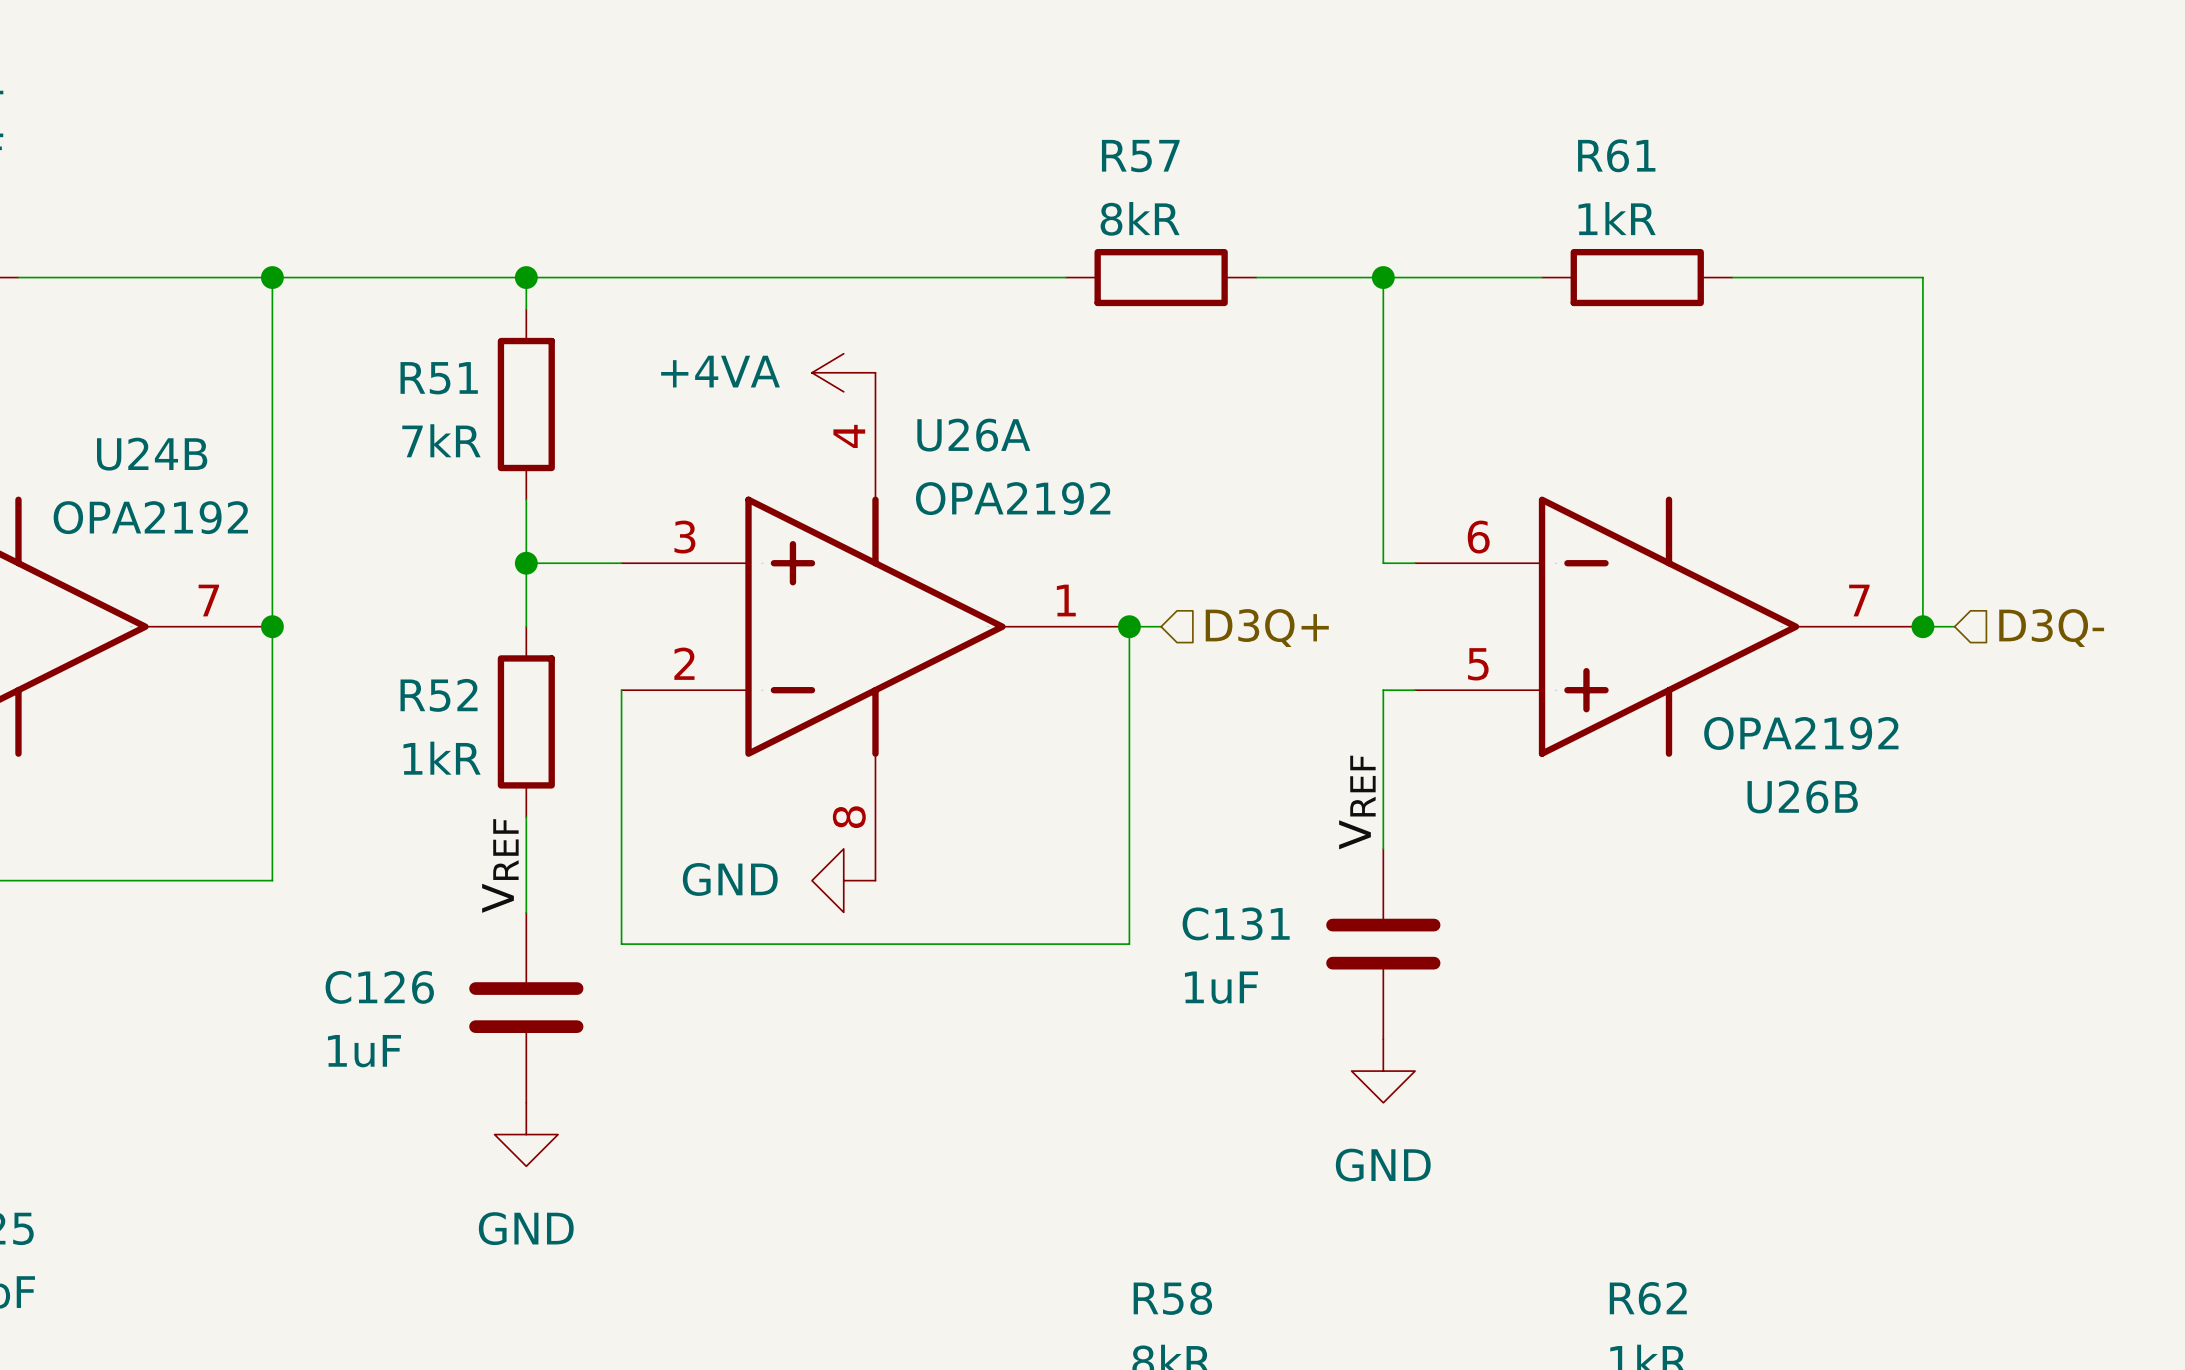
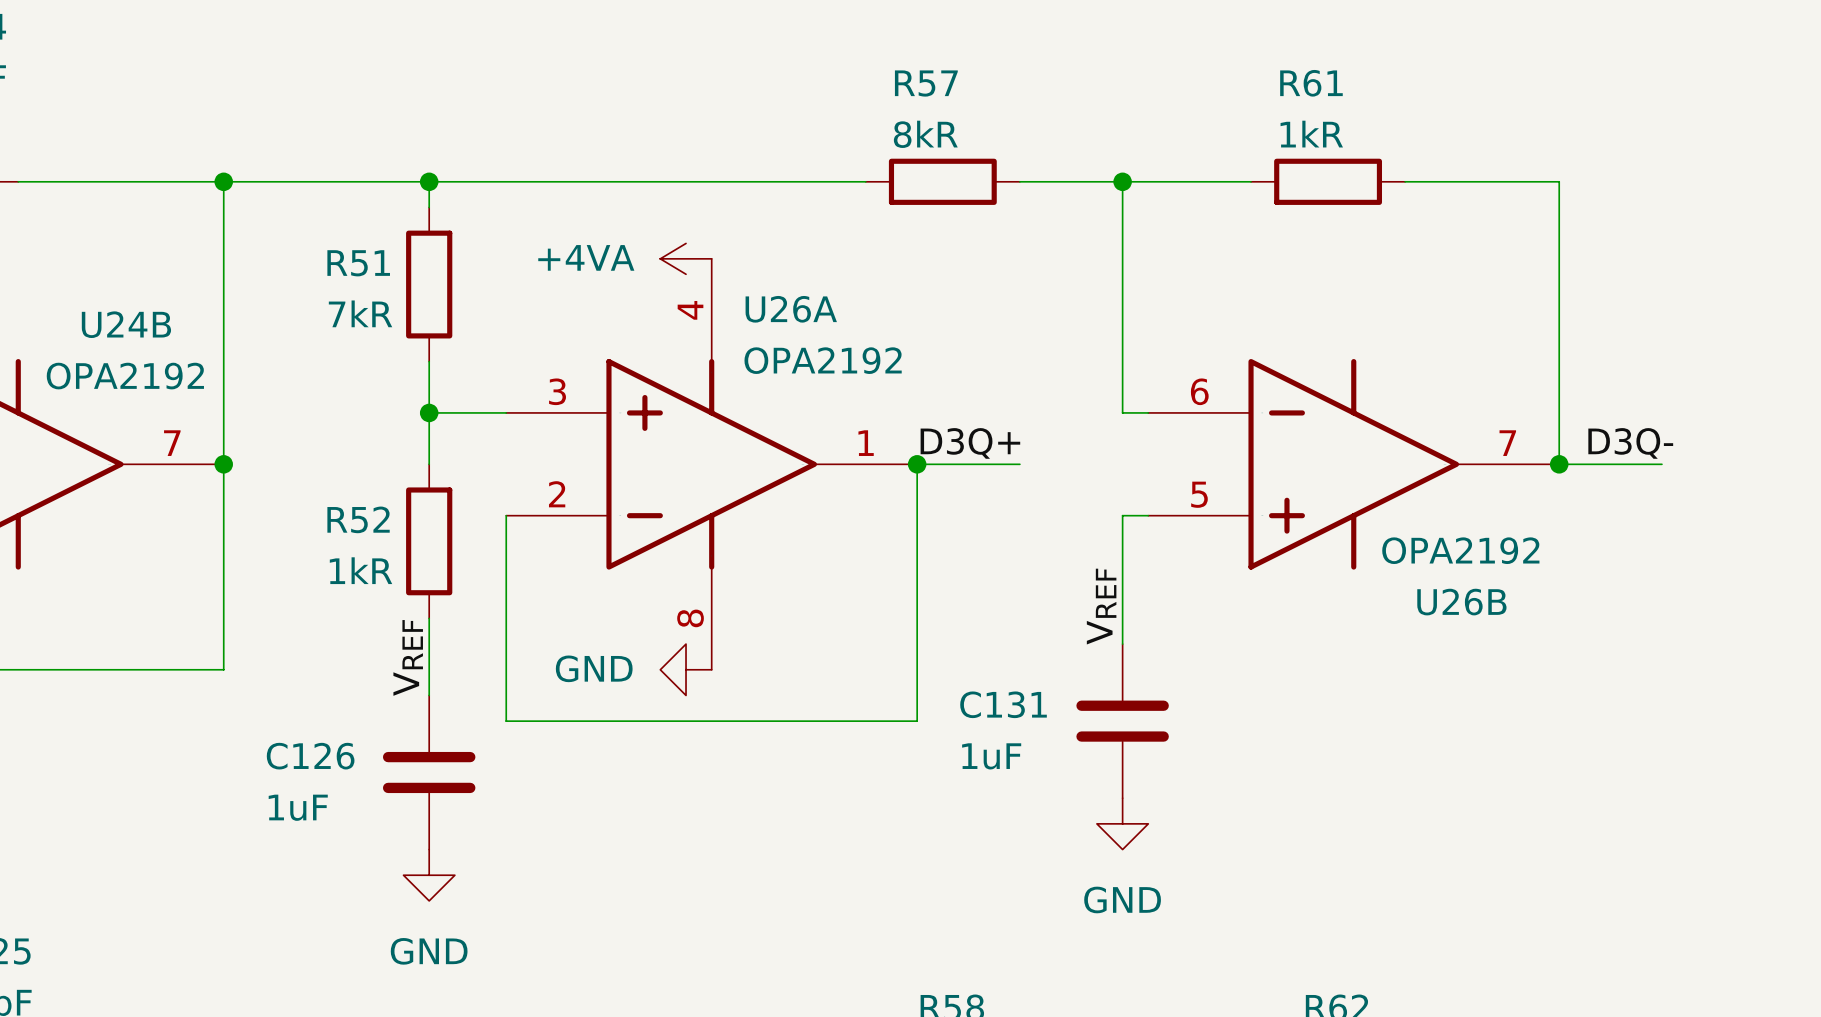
label: none -> D3Q+ (970, 443)
label: none -> D3Q- (1630, 443)
wire: none -> (942, 464) (1019, 464)
wire: none -> (1584, 464) (1661, 464)
hierarchical label: D3Q+ (1267, 628) -> none
hierarchical label: D3Q- (2051, 628) -> none

